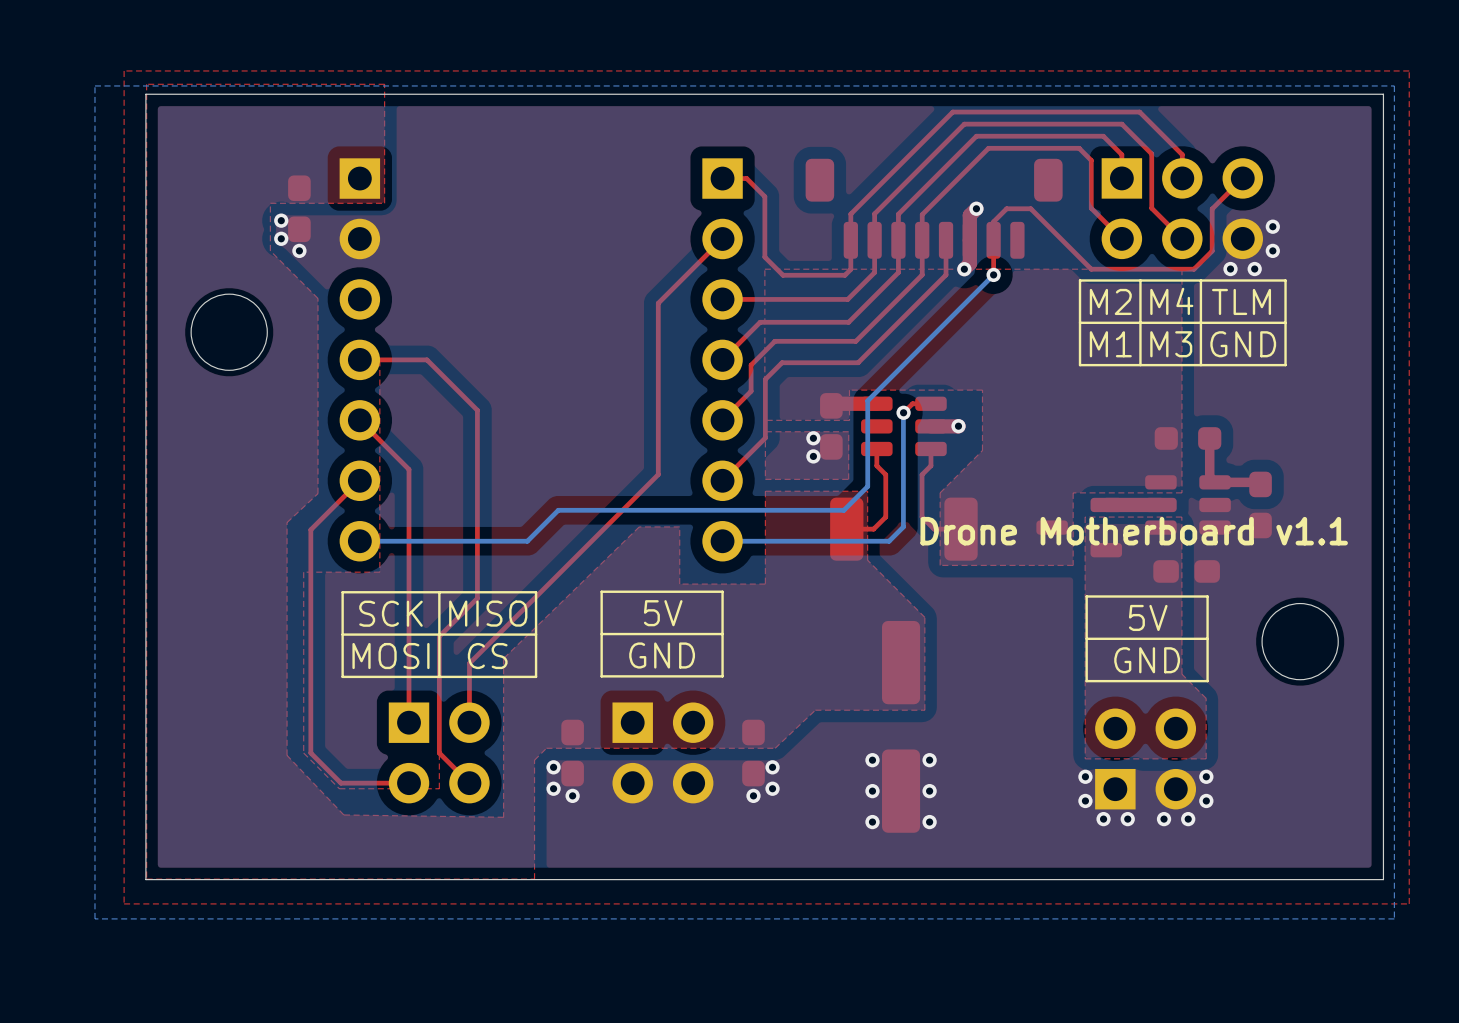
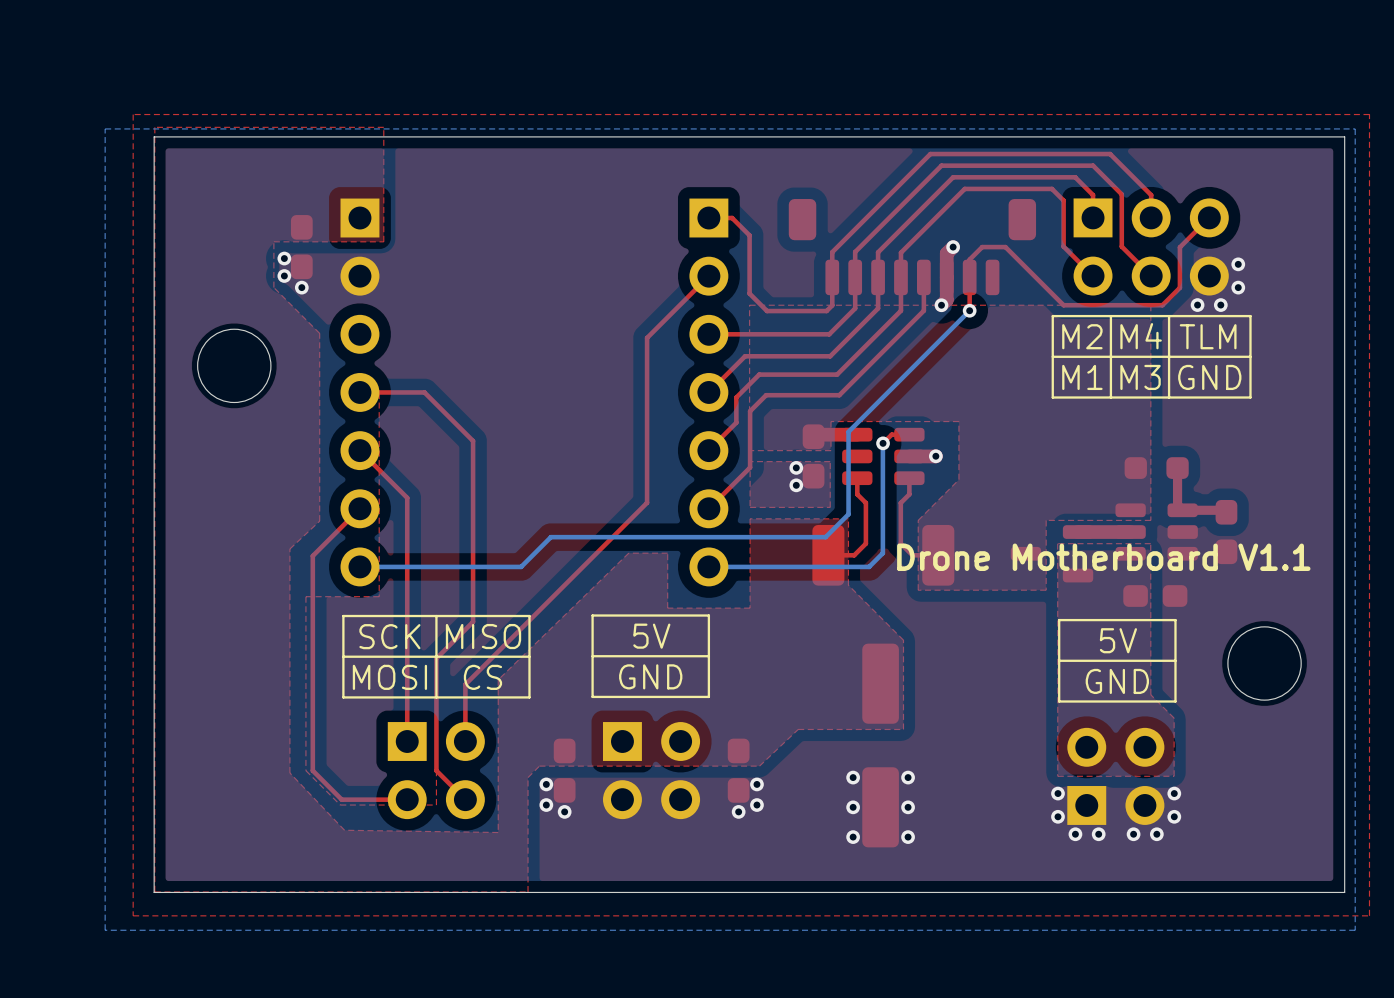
text: Drone Motherboard v1.1 (1134, 531) -> Drone Motherboard V1.1 (1103, 557)

